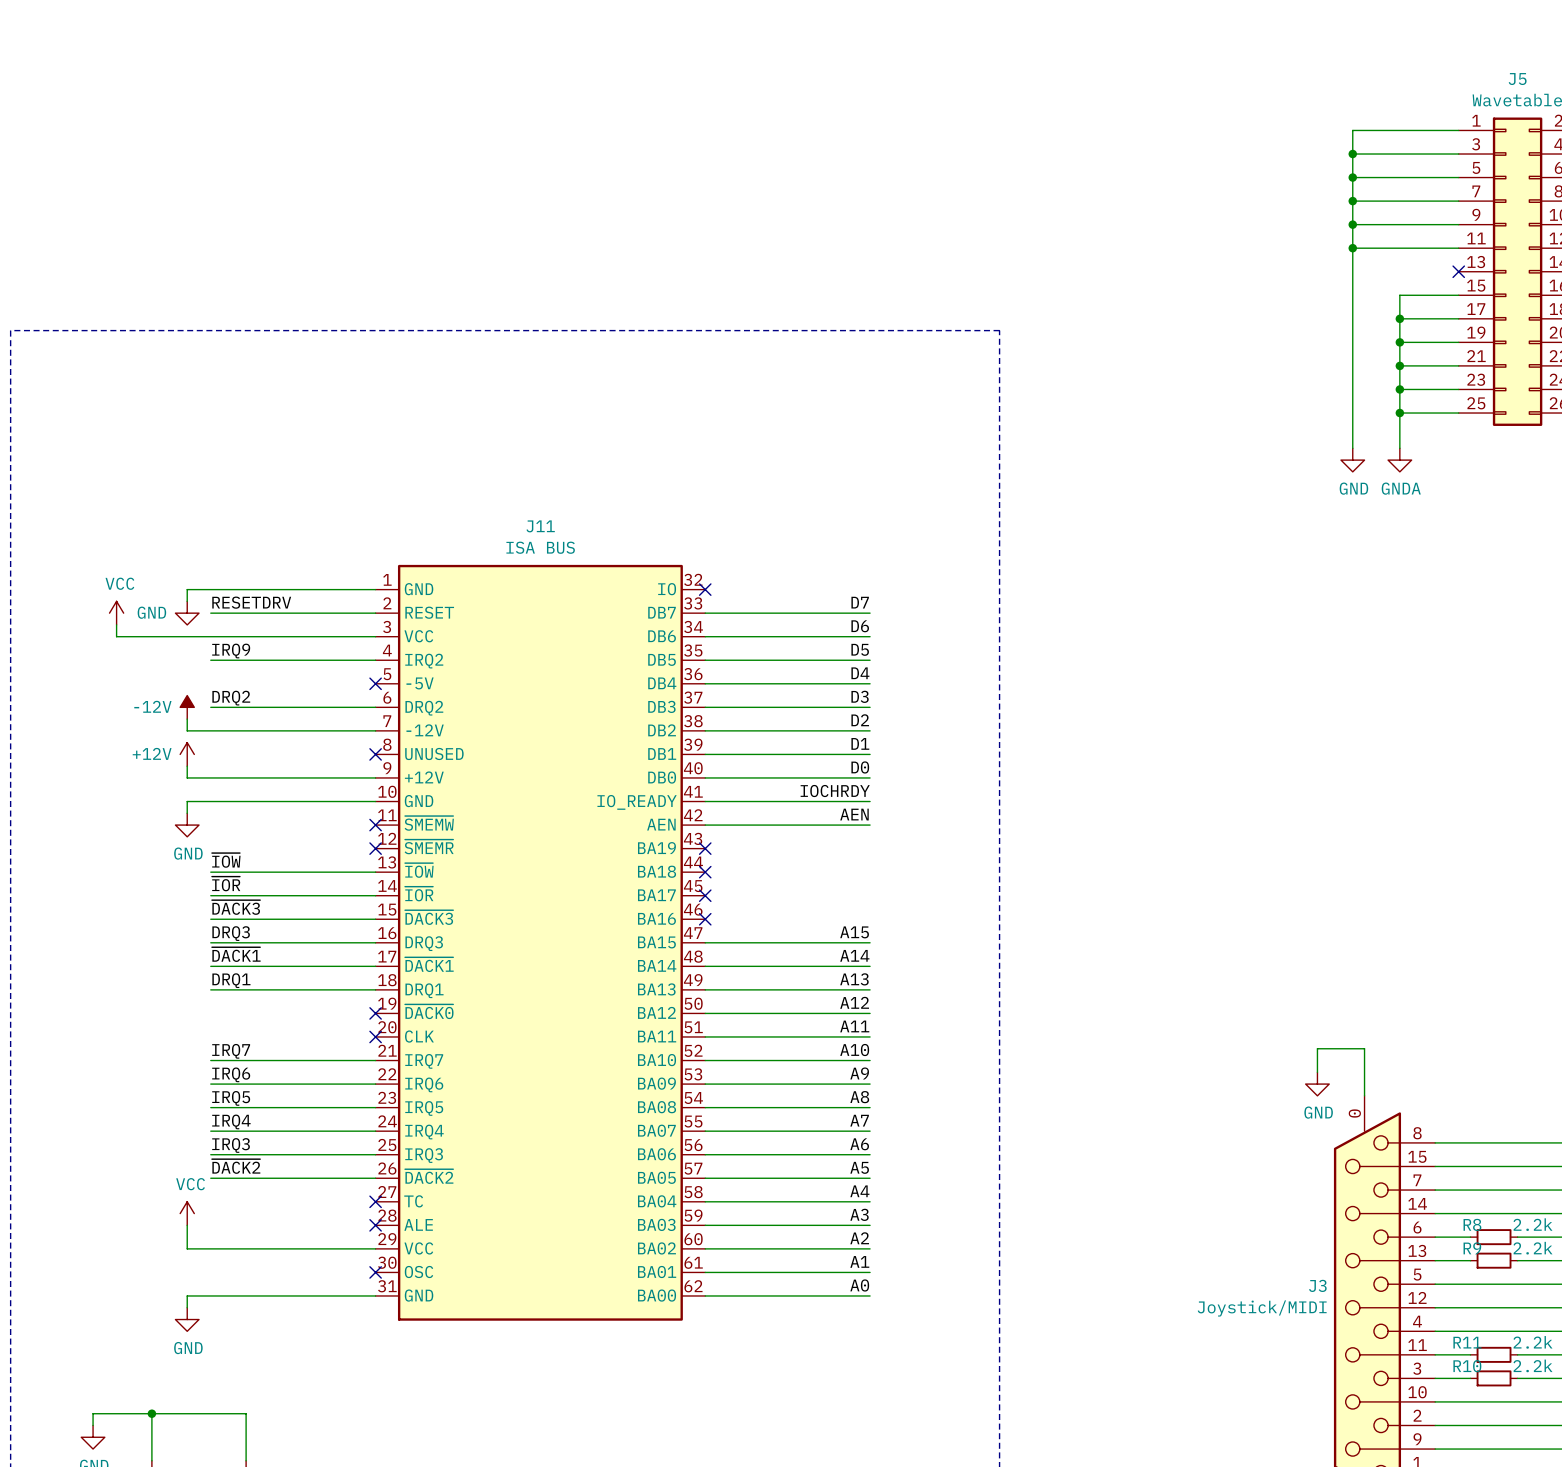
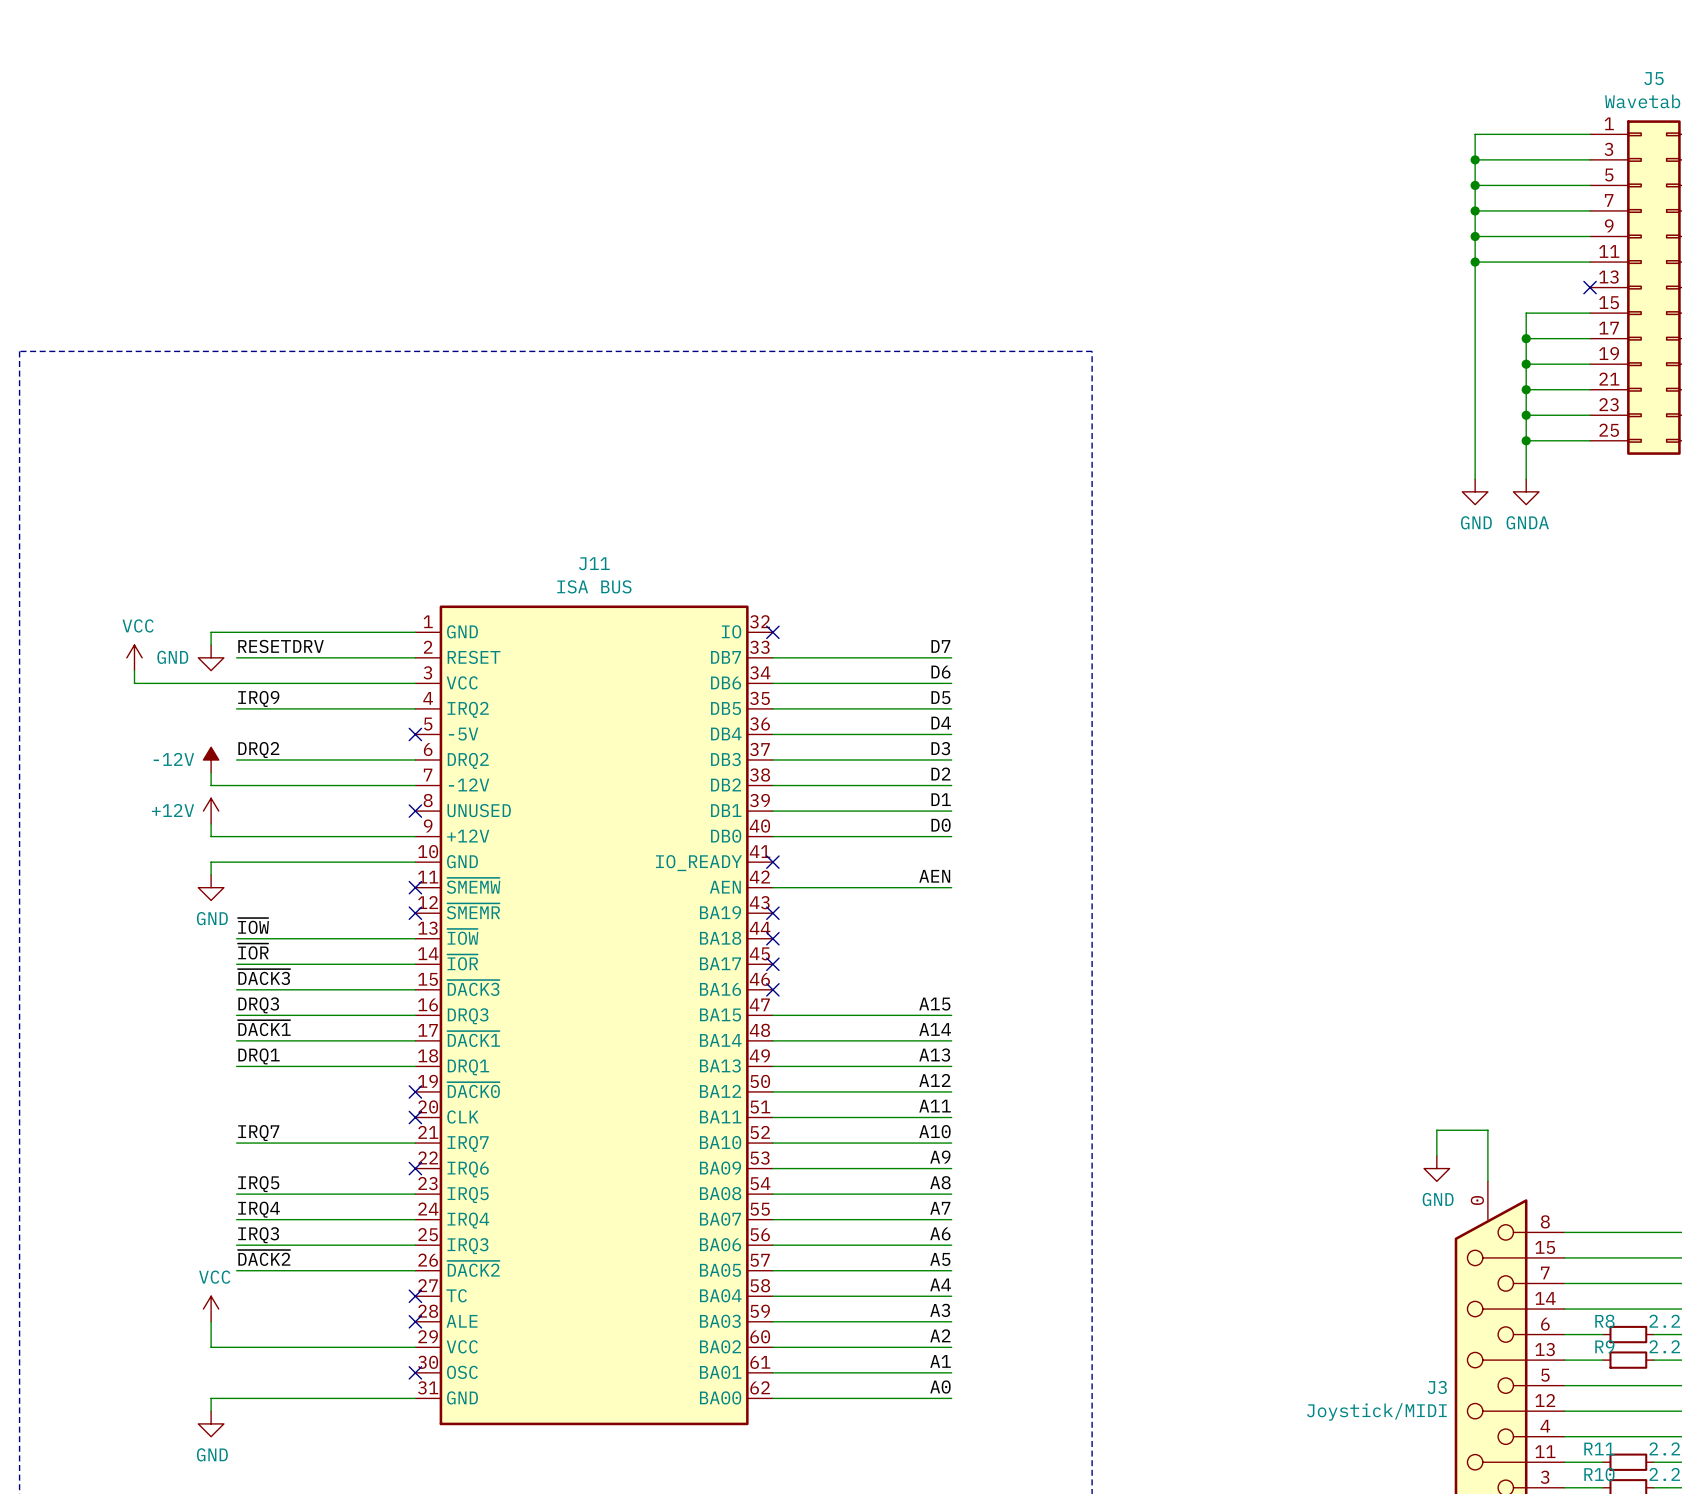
label: IOCHRDY (835, 791) -> none
wire: (705, 801) (870, 801) -> none
no-connect mark: none -> (772, 862)
label: IRQ6 (231, 1074) -> none
wire: (210, 1084) (375, 1084) -> none
no-connect mark: none -> (415, 1168)

